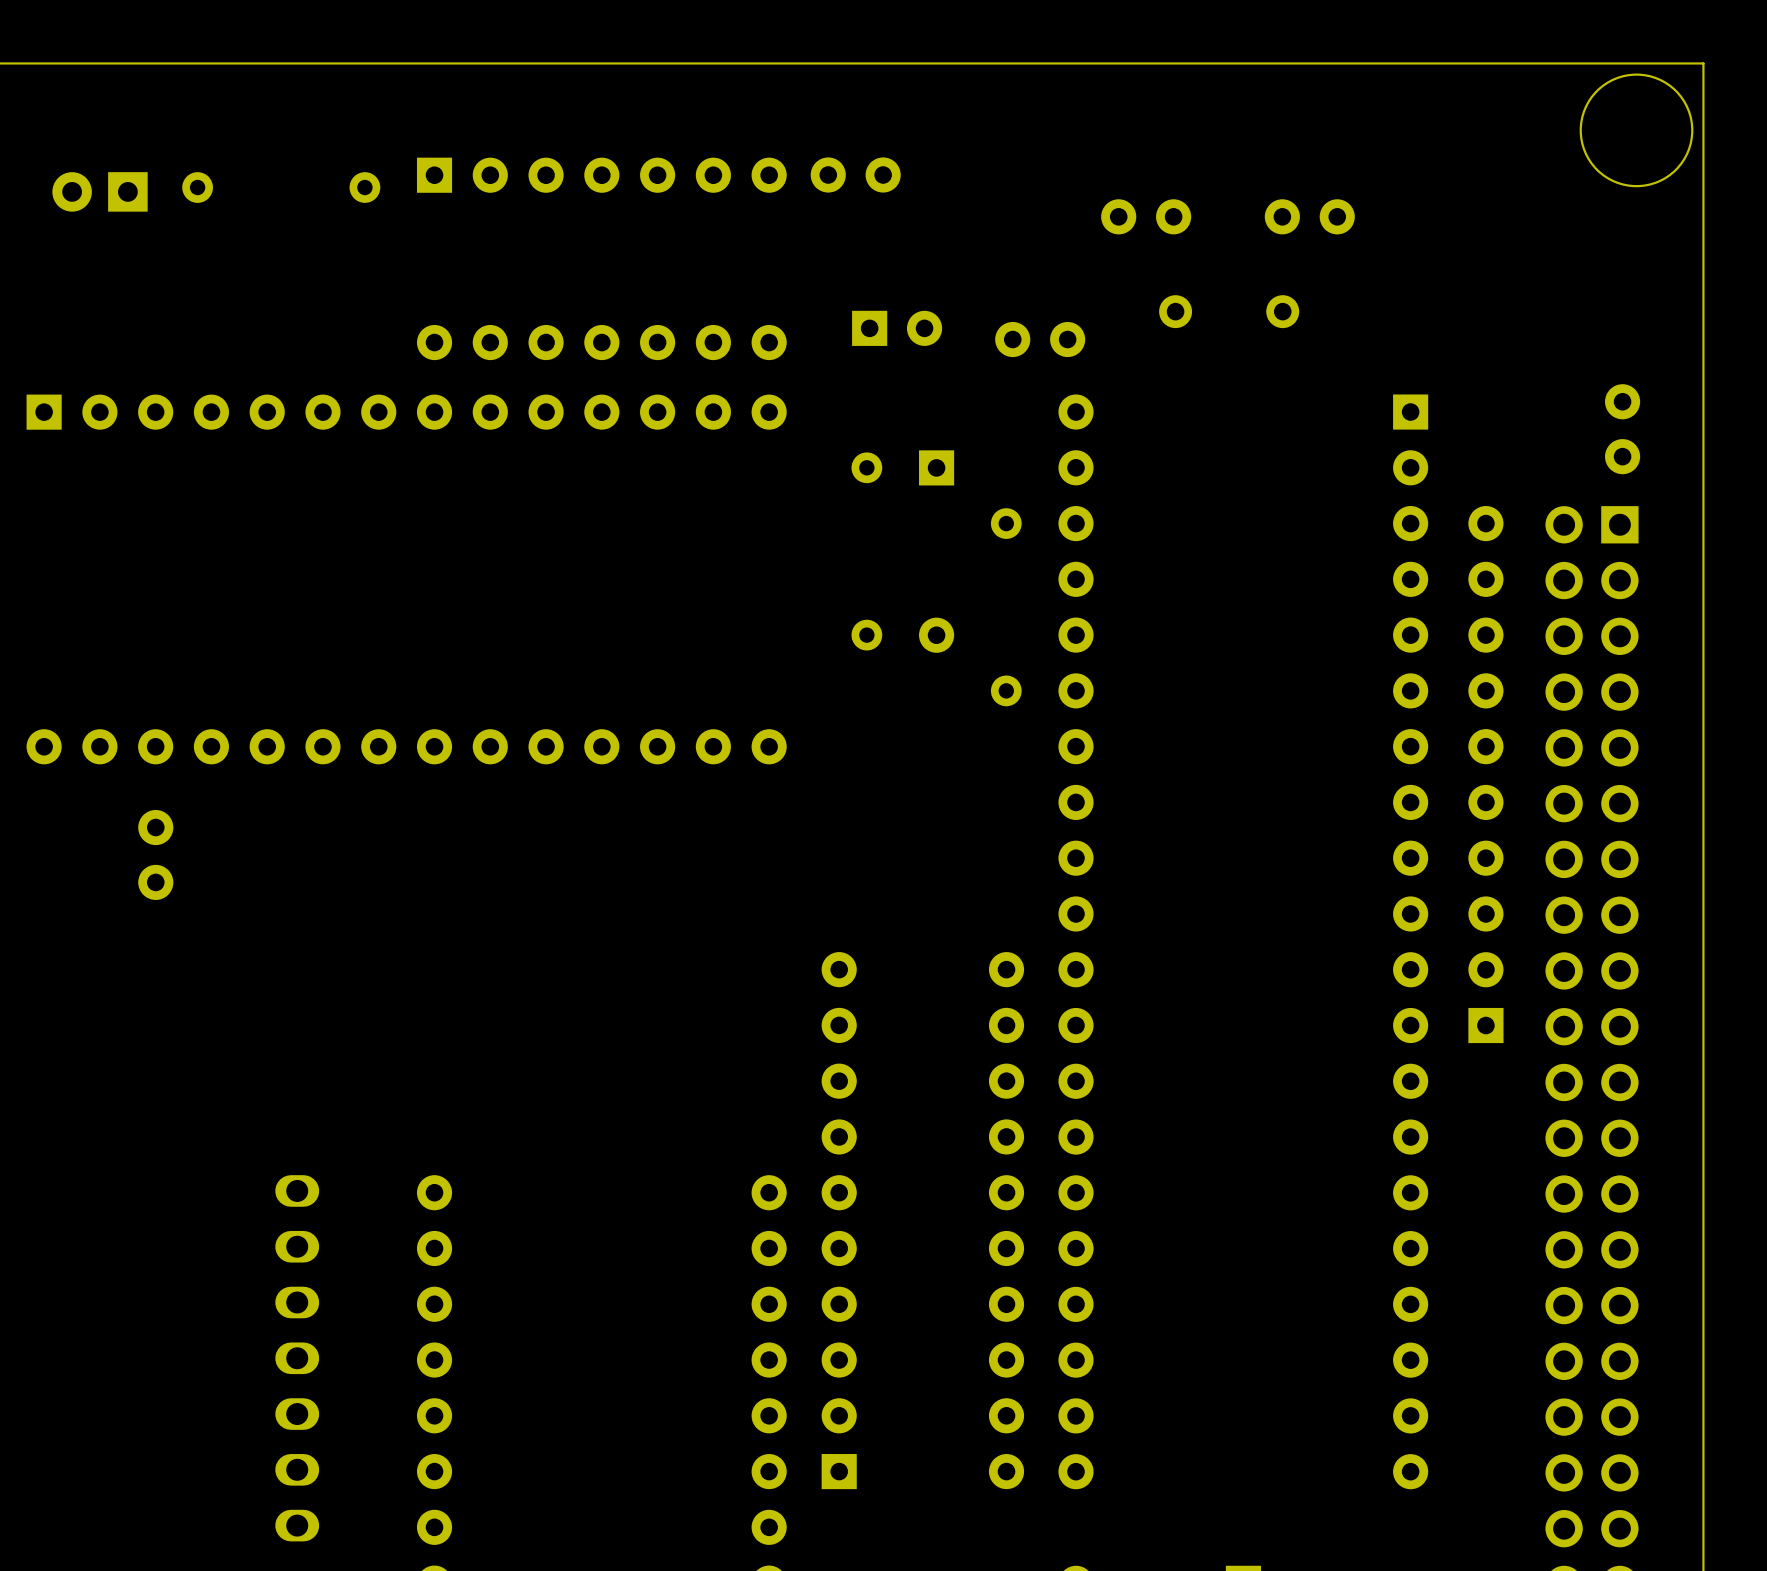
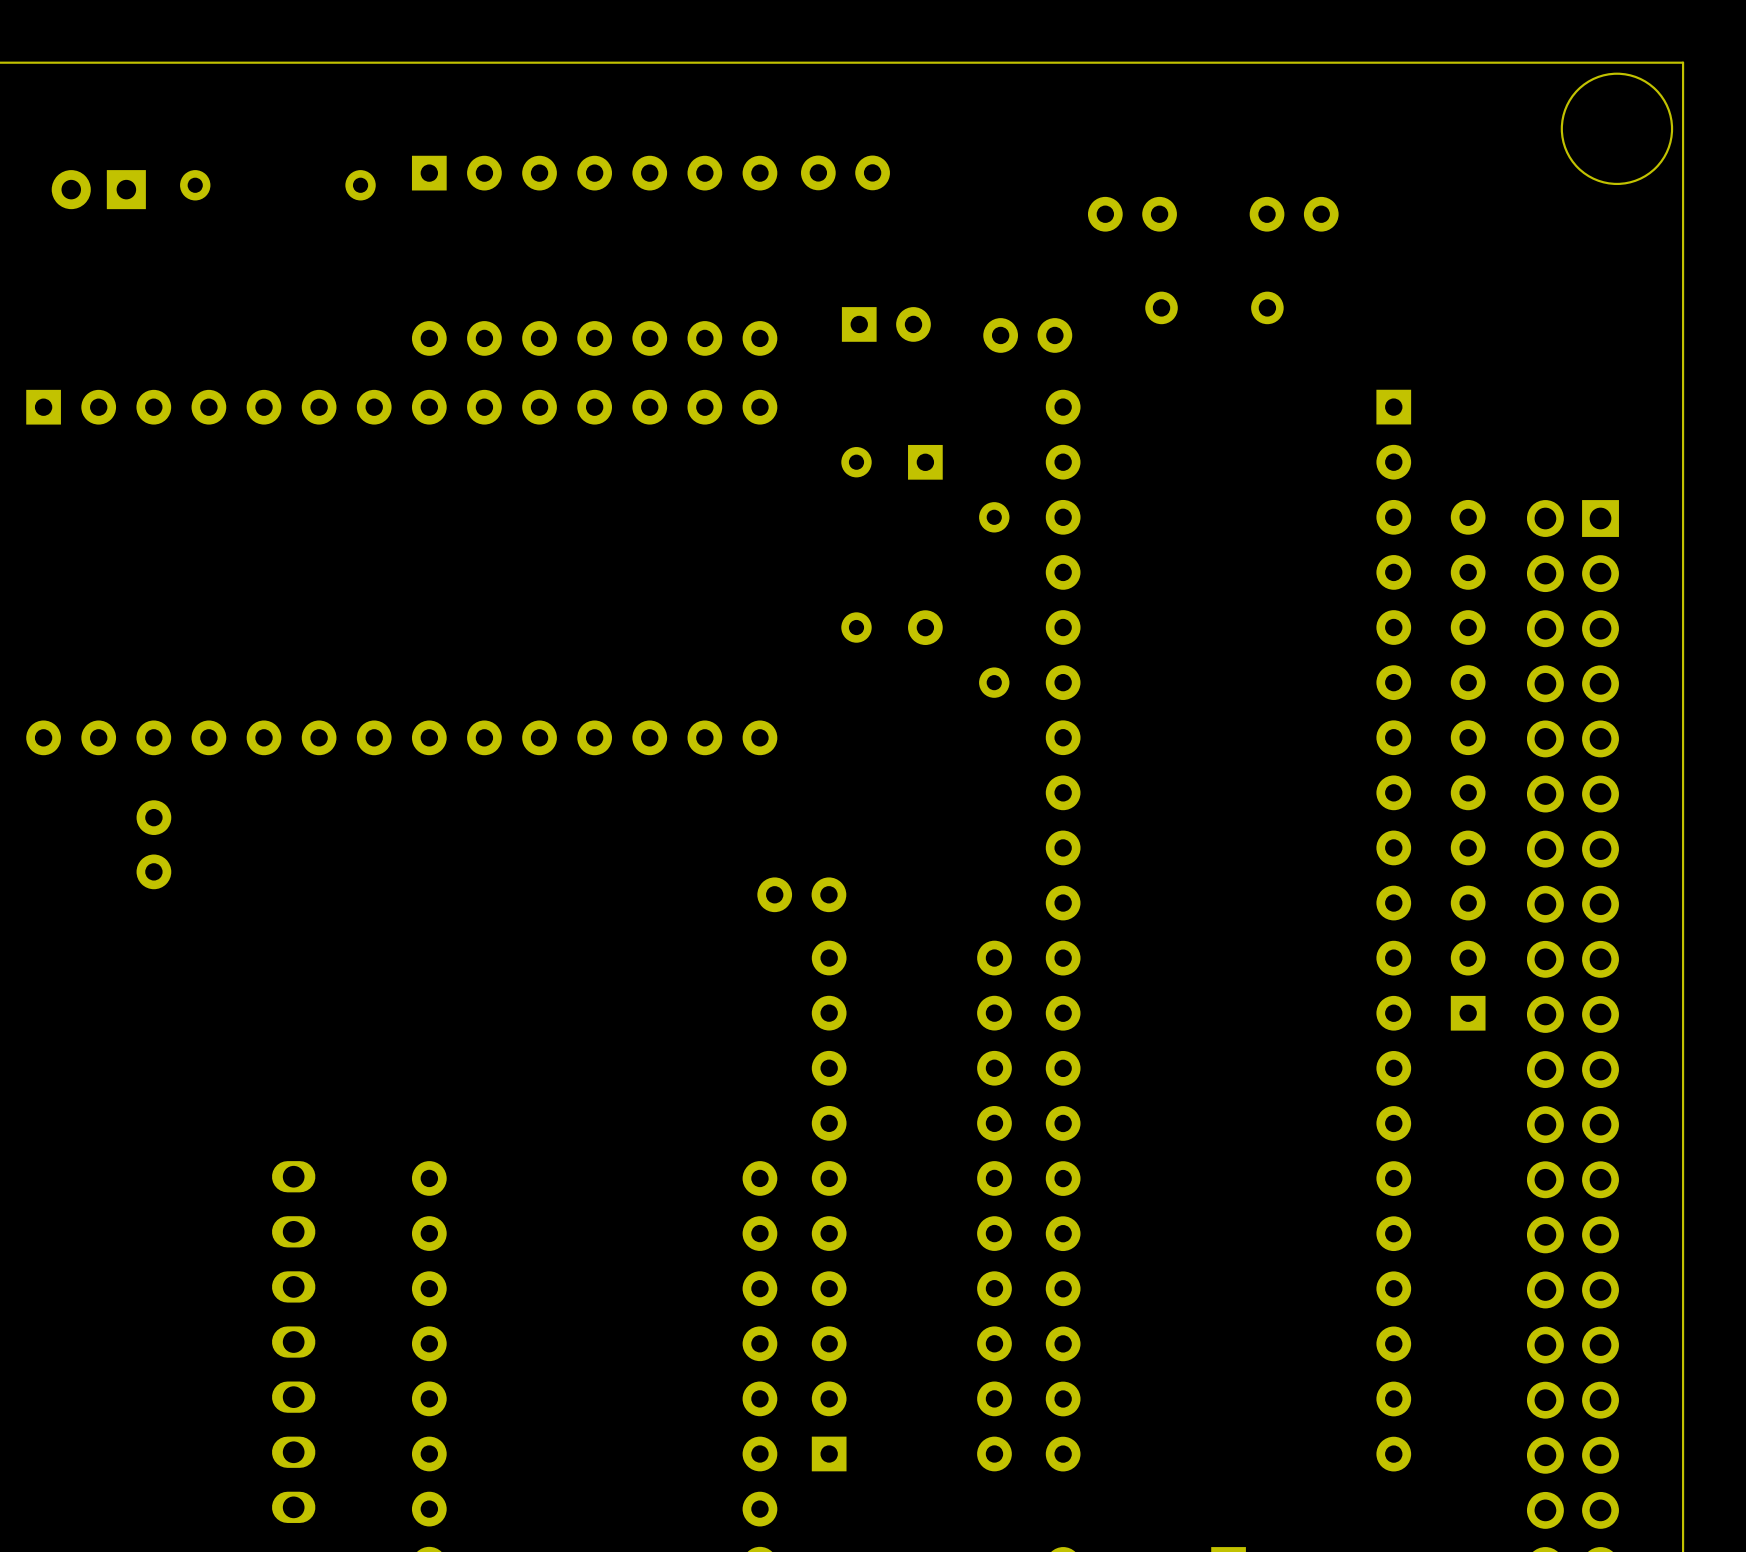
part: (1622, 429) -> none
part: none -> (801, 894)

